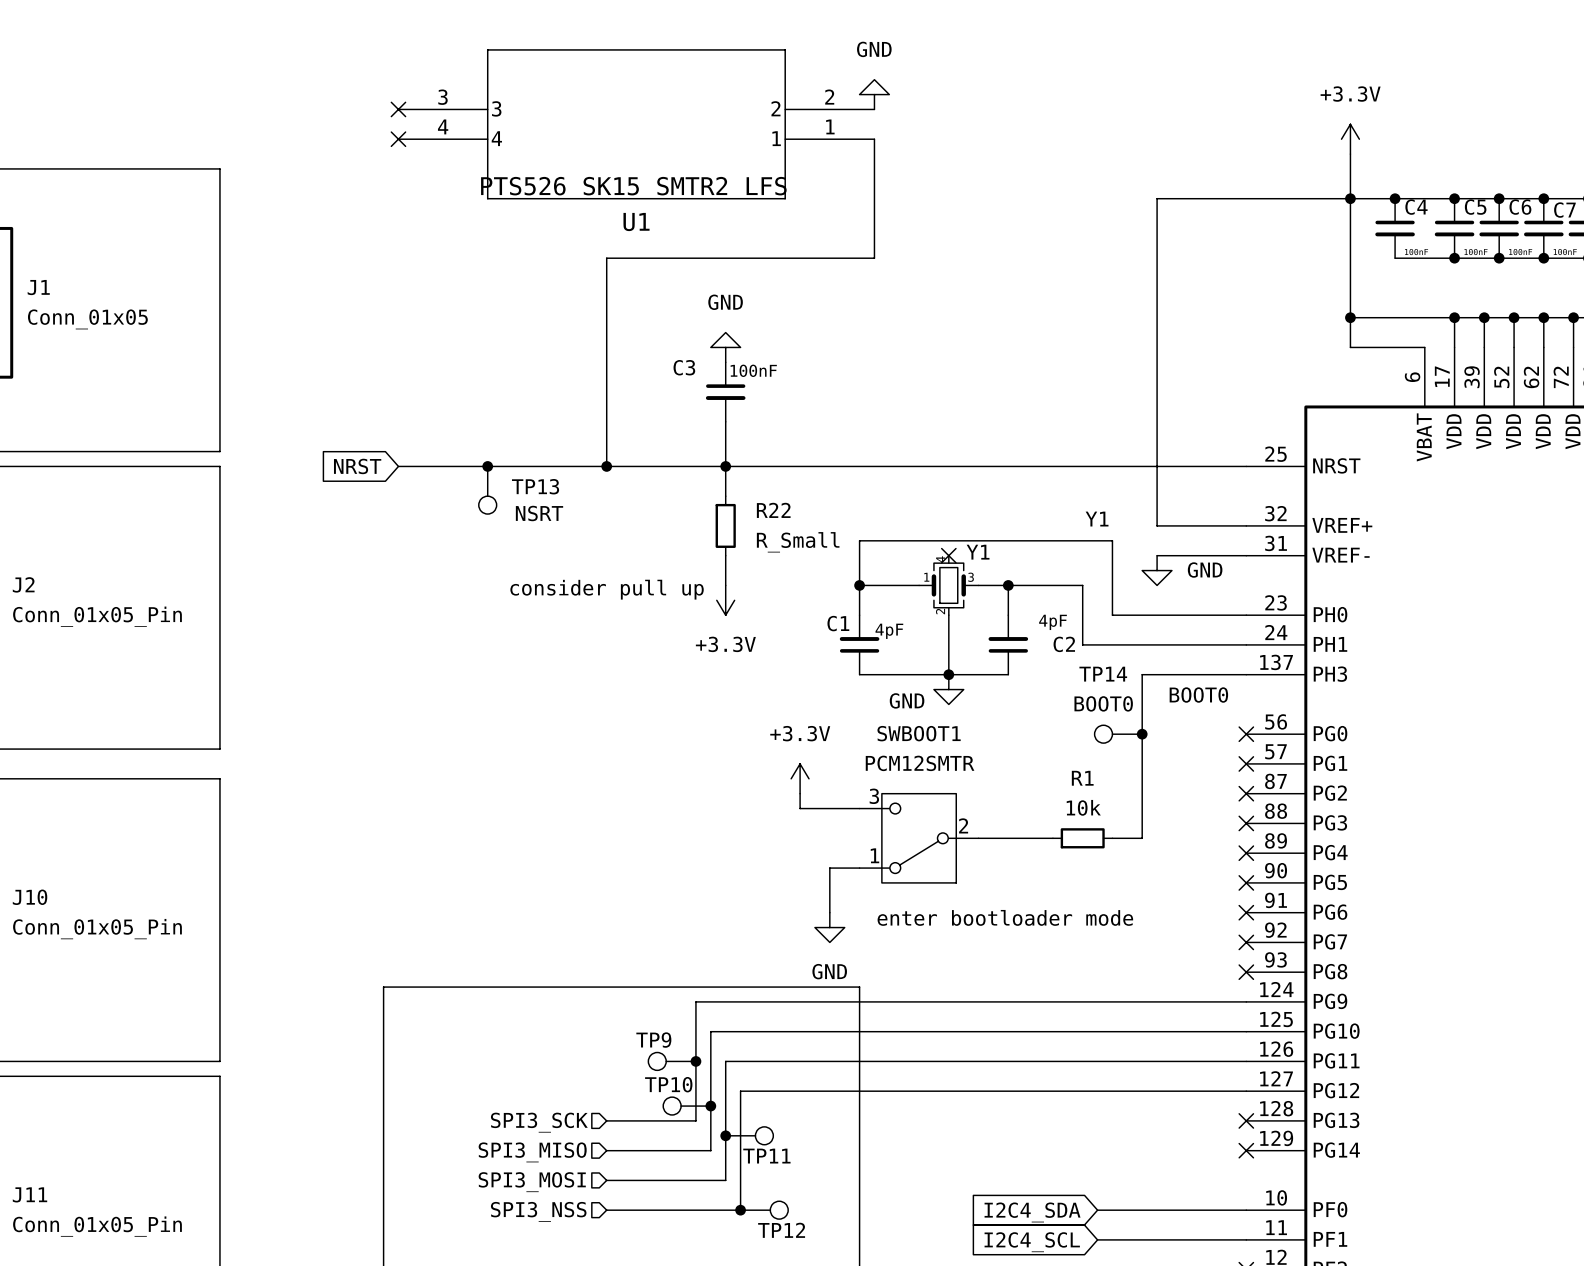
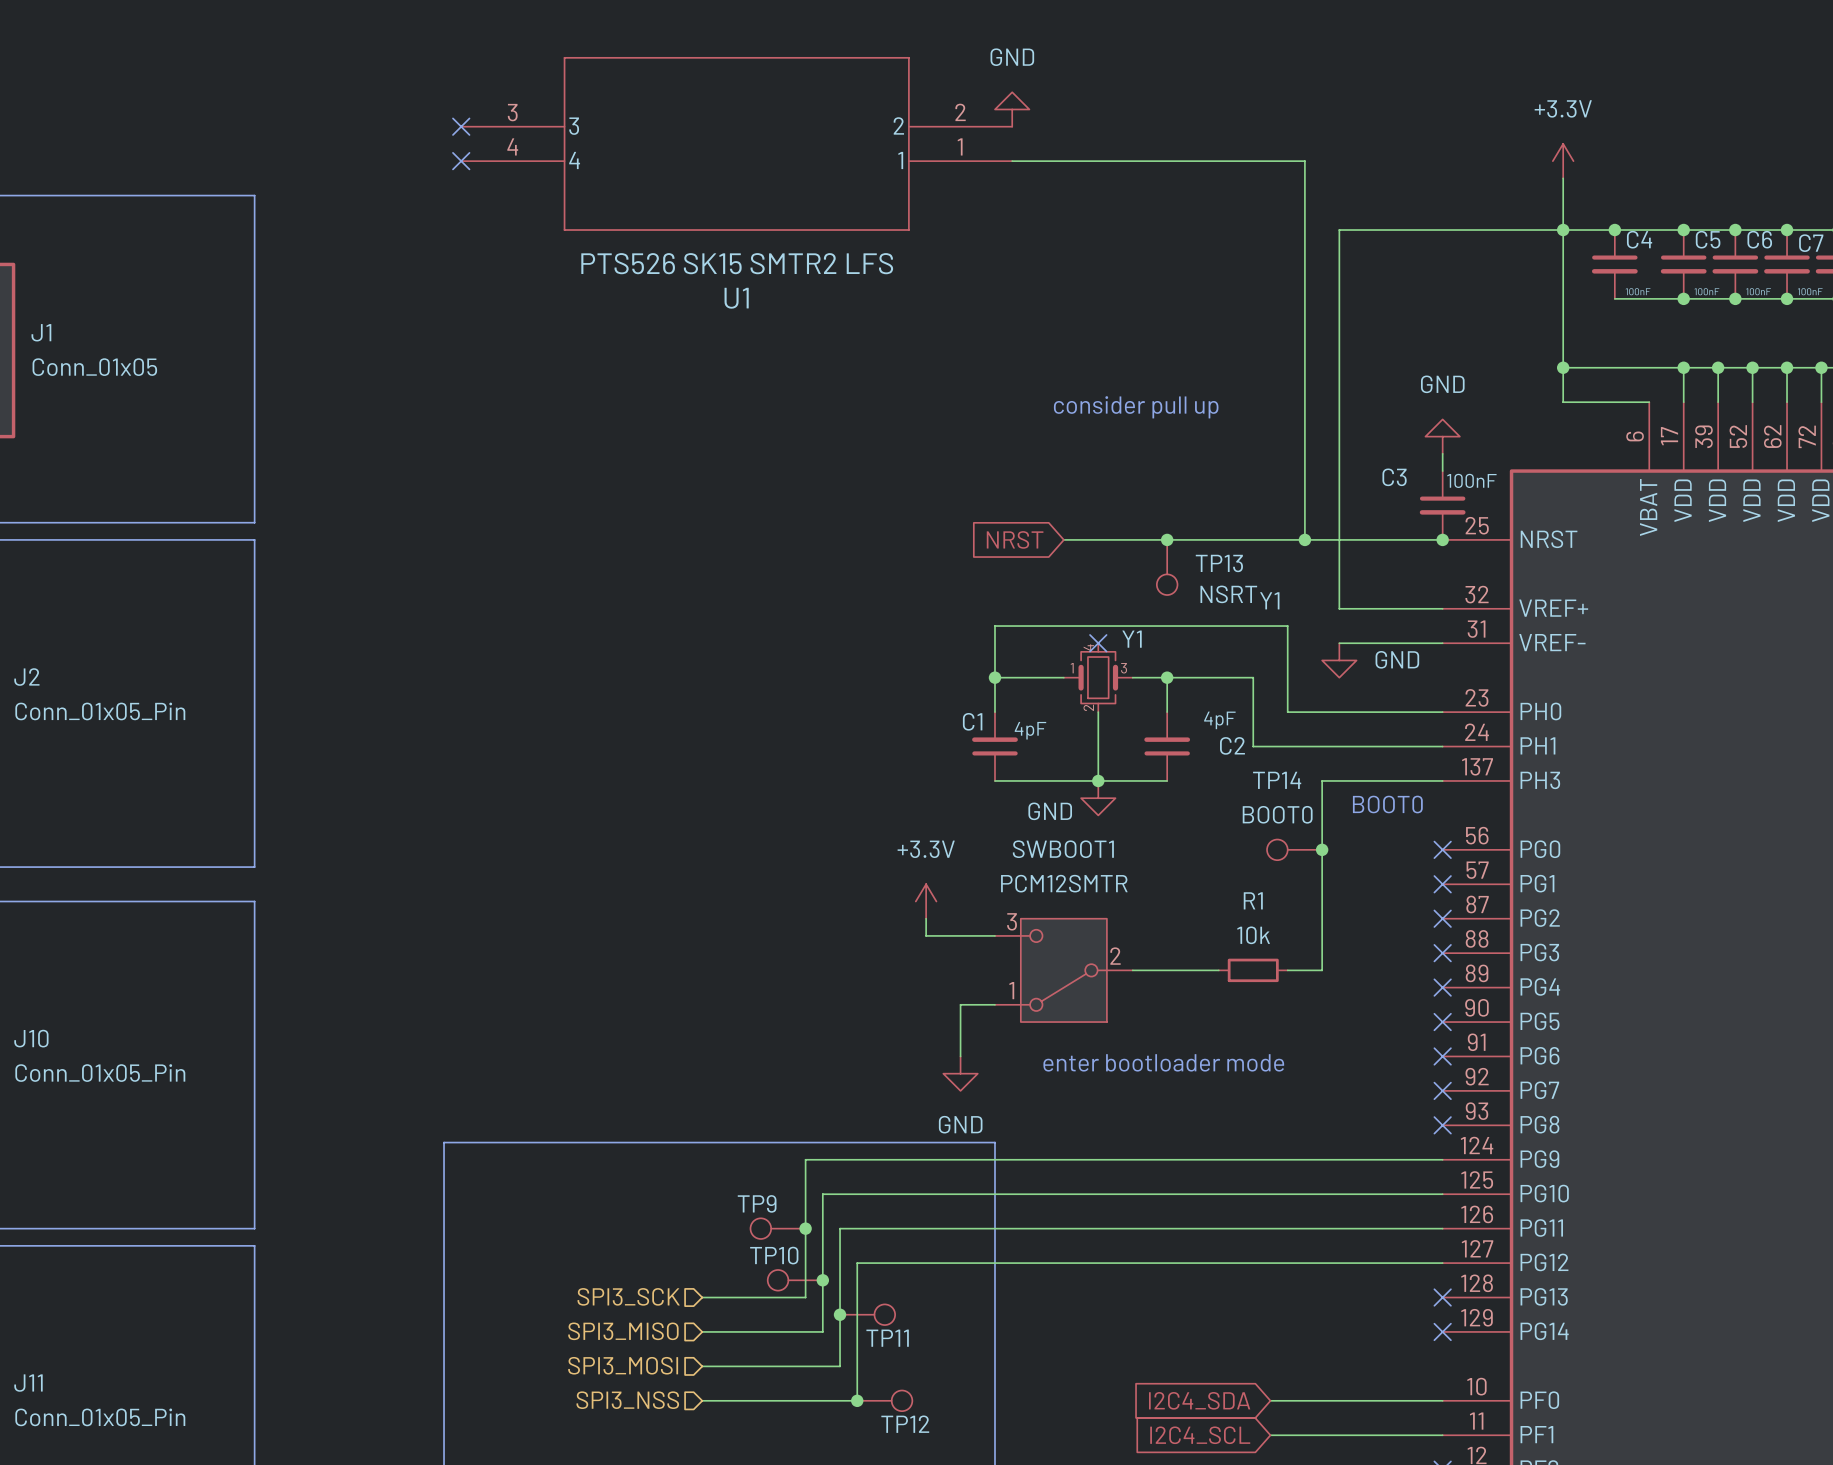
wire: (874, 139) (874, 258) (606, 258) (606, 466) -> (1012, 161) (1304, 161) (1304, 539)
U1 value position: PTS526 SK15 SMTR2 LFS (633, 186) -> PTS526 SK15 SMTR2 LFS (737, 263)
U1 name position: U1 (636, 222) -> U1 (736, 298)
power symbol: GND (725, 347) -> none
text: none -> consider pull up (1136, 407)
power symbol: none -> GND (1442, 436)
C3 position: (725, 392) -> (1442, 505)
wire: none -> (1442, 453) (1442, 471)
wire: (725, 421) (725, 496) -> none
global label: NRST (357, 466) -> none
wire: (398, 466) (919, 466) -> none
junction: (487, 466) -> none
junction: (606, 466) -> none
junction: (725, 466) -> none
global label: none -> NRST (1015, 539)
junction: none -> (1167, 539)
junction: none -> (1304, 539)
junction: none -> (1442, 539)
TP13 position: (487, 490) -> (1167, 567)
R22: R_Small (725, 525) -> none
wire: (725, 555) (725, 585) -> none
text: consider pull up (607, 589) -> none
power symbol: +3.3V (725, 600) -> none

